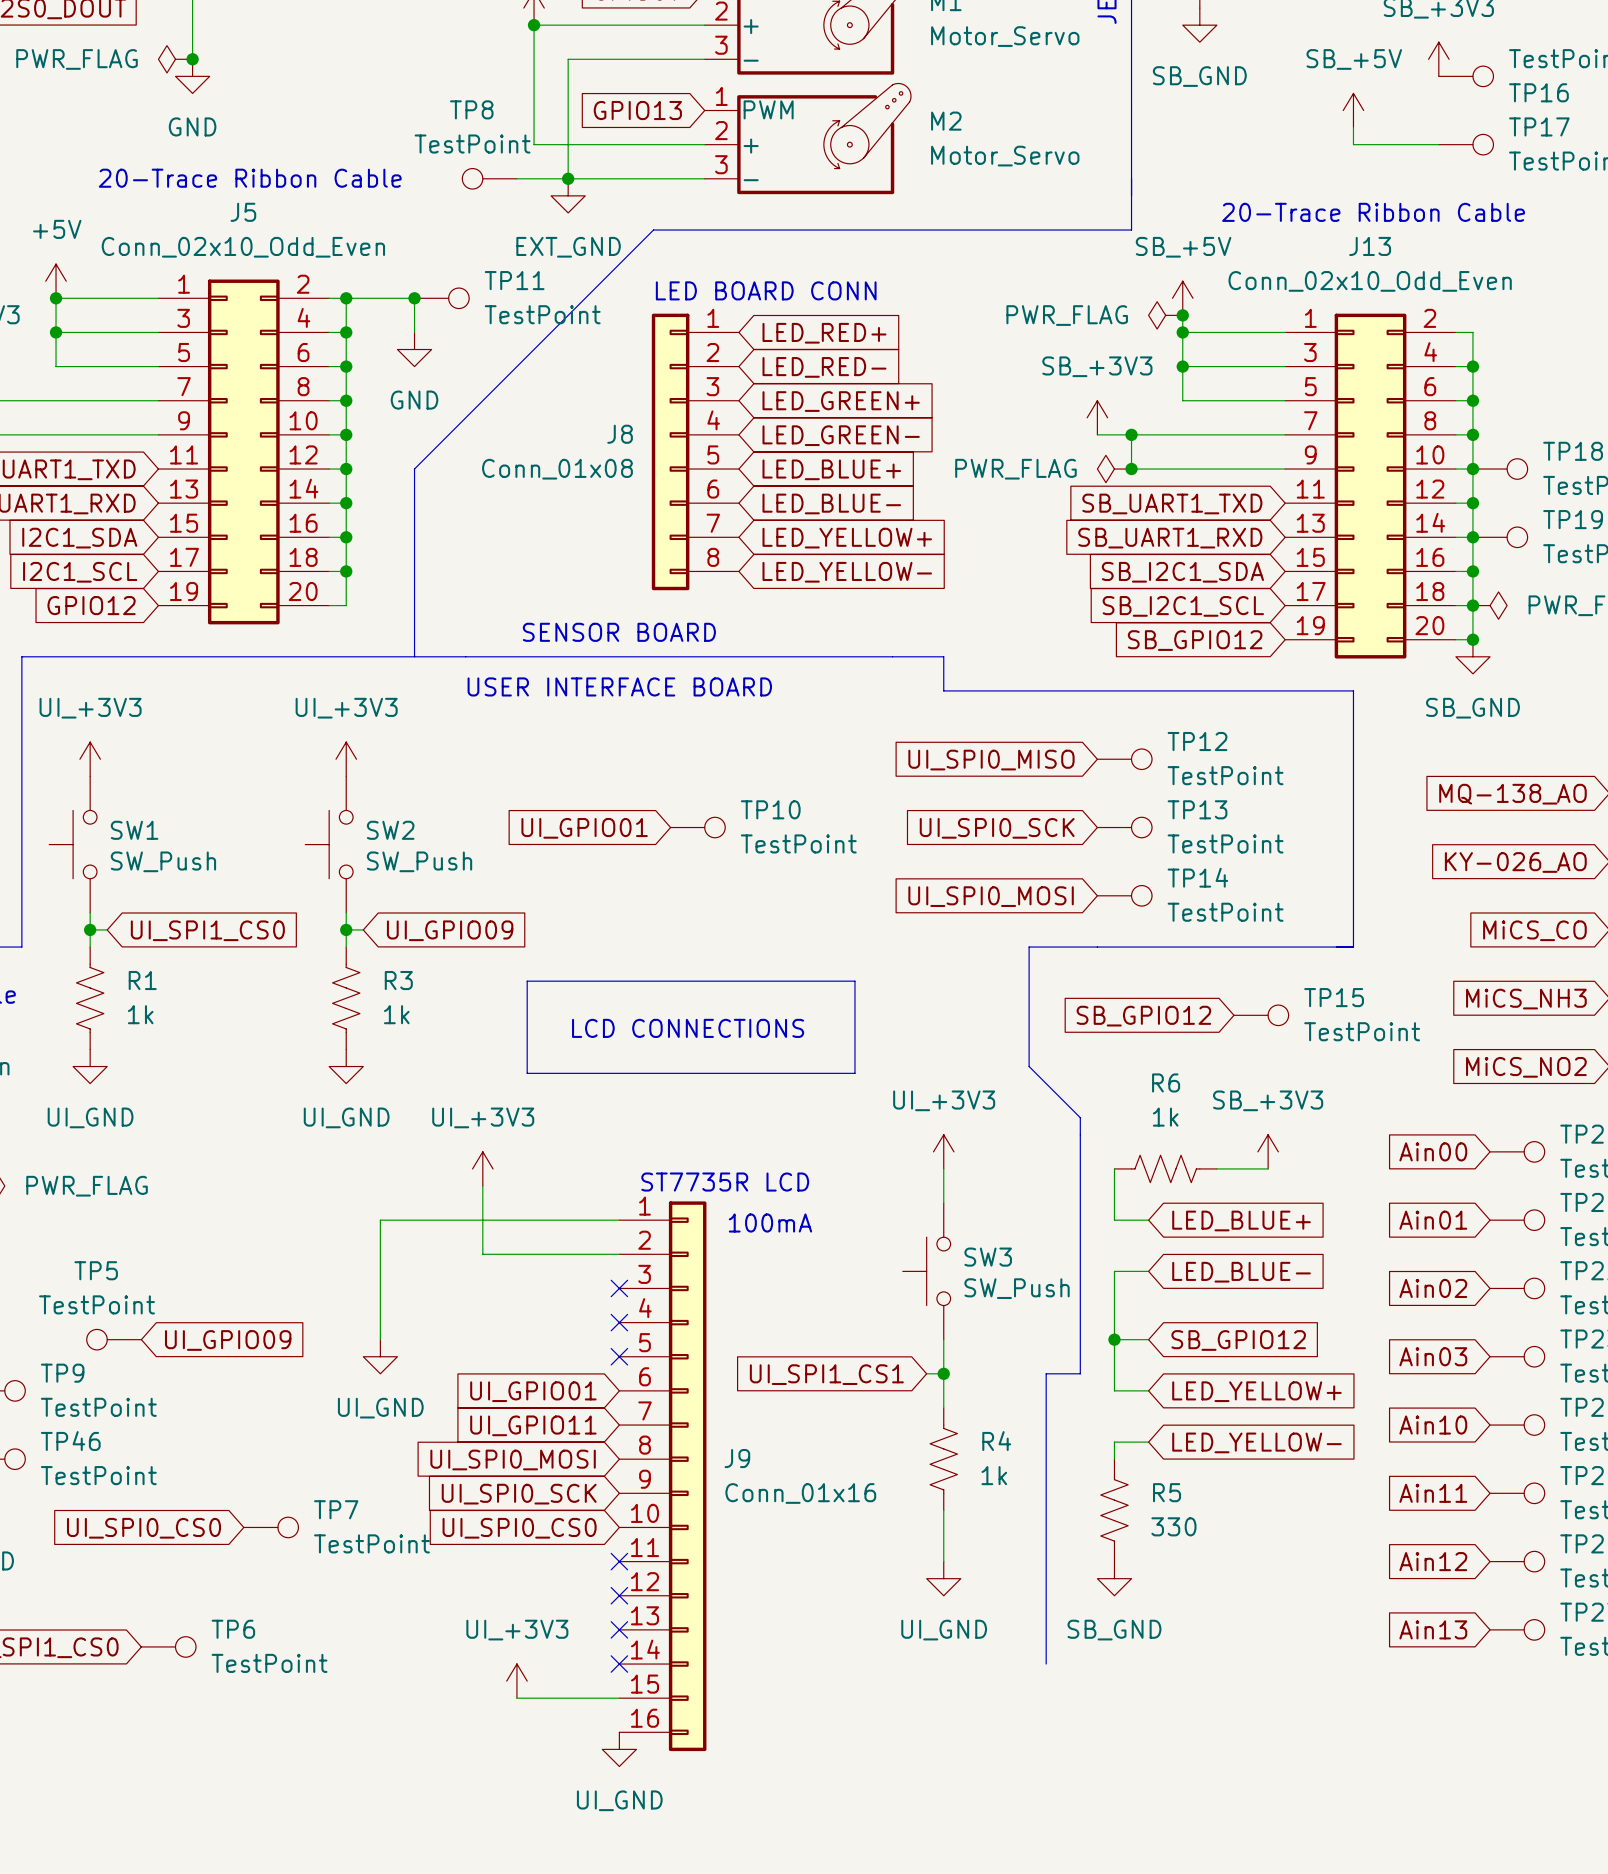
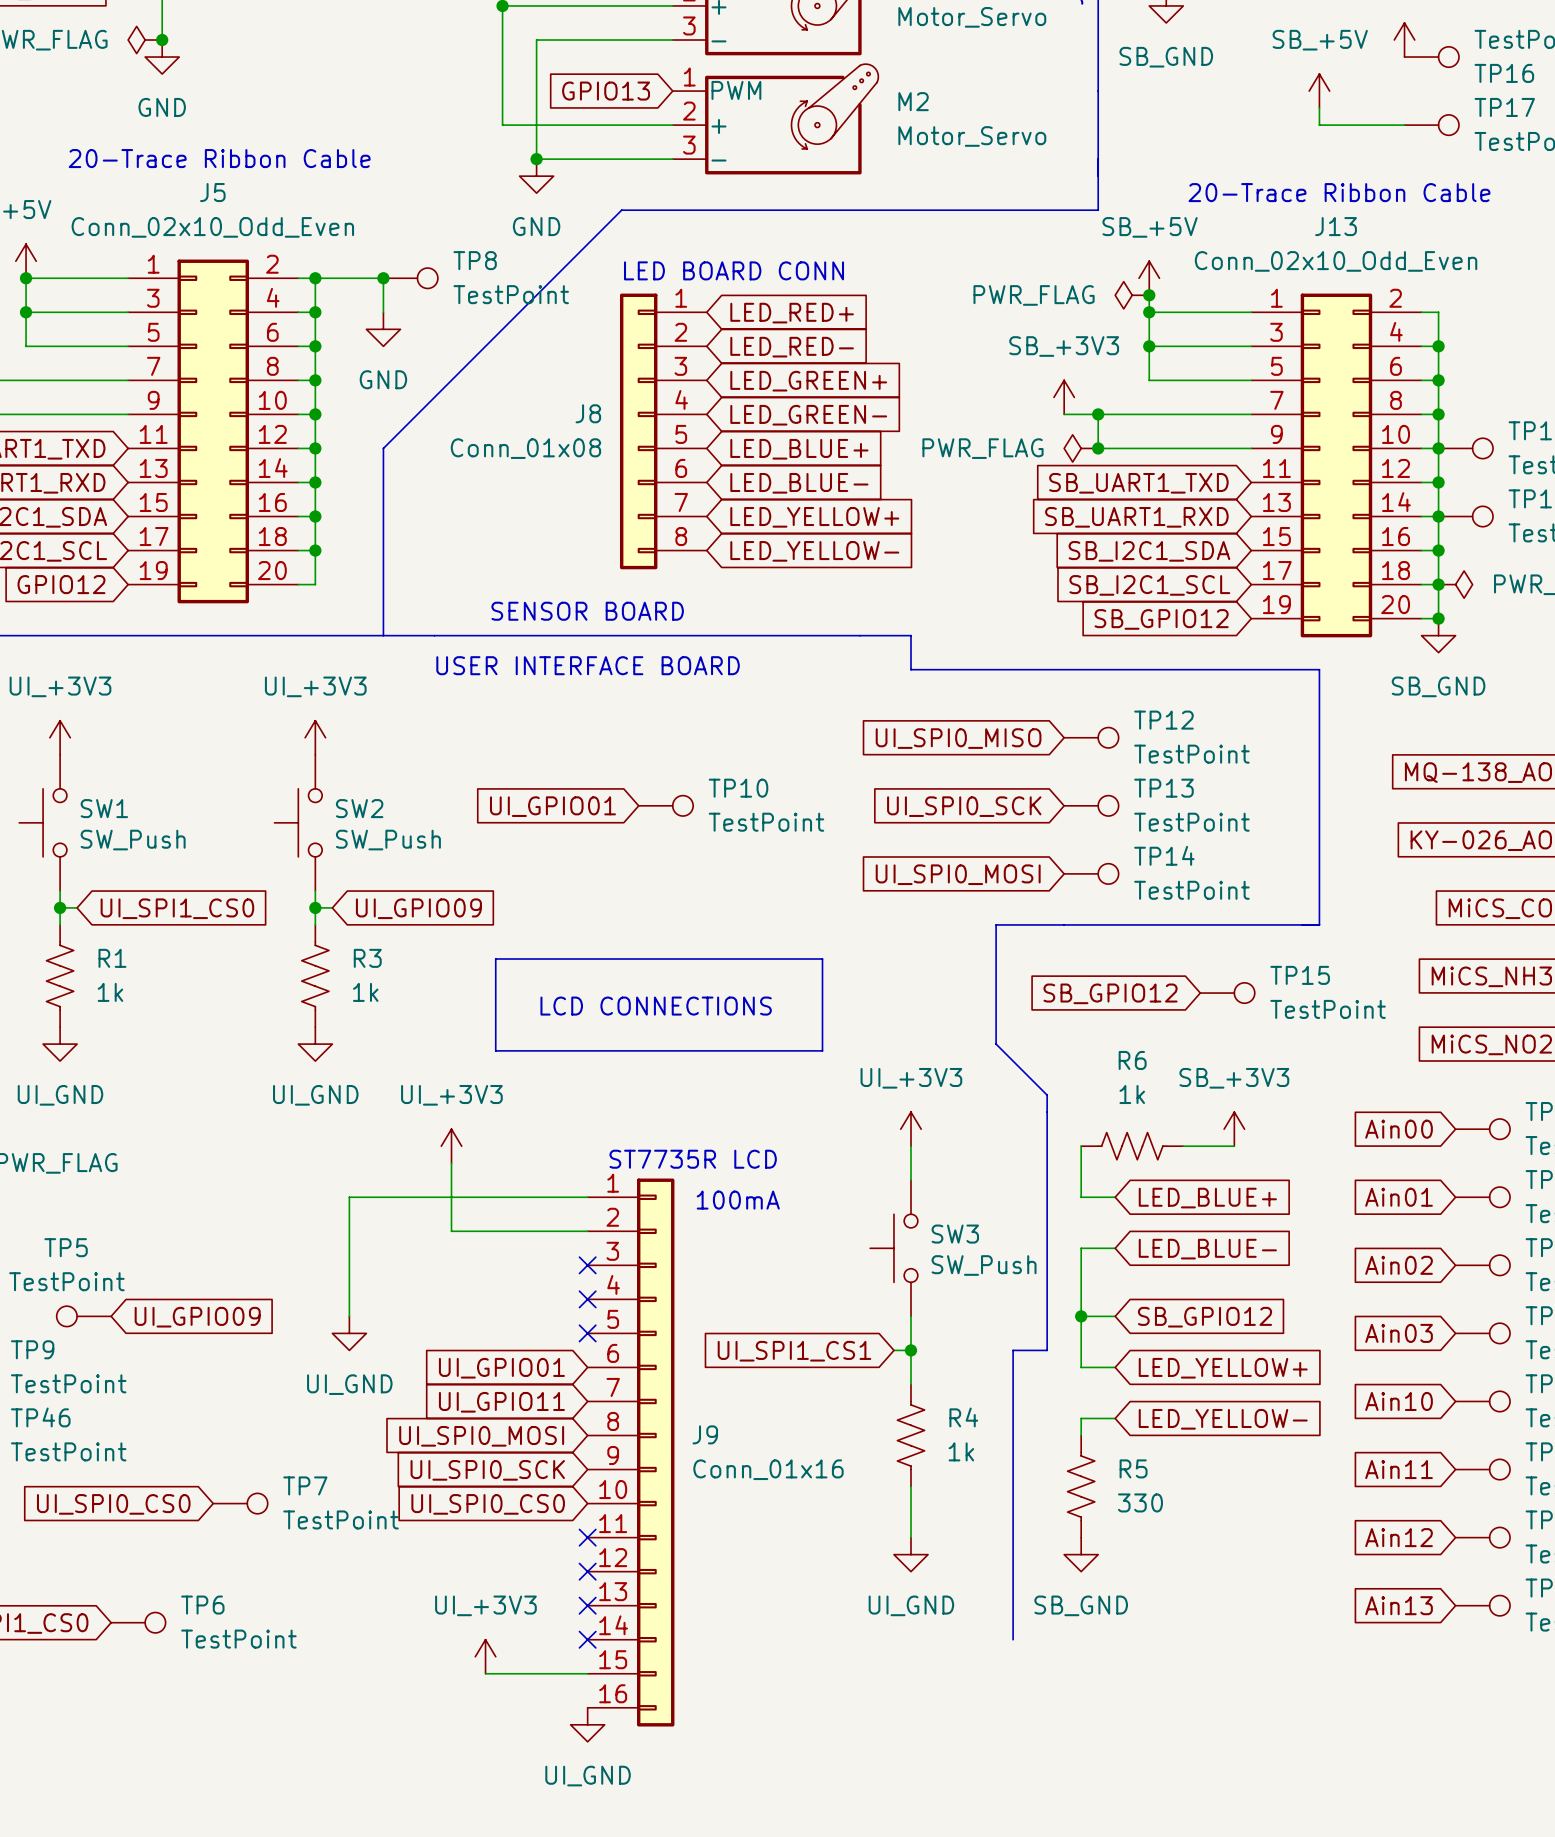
TP8: TestPoint (489, 178) -> none
wire: (516, 178) (568, 178) -> none
power symbol: EXT_GND (568, 195) -> GND (536, 176)
TP11 name: TP11 (514, 280) -> TP8 (475, 260)

